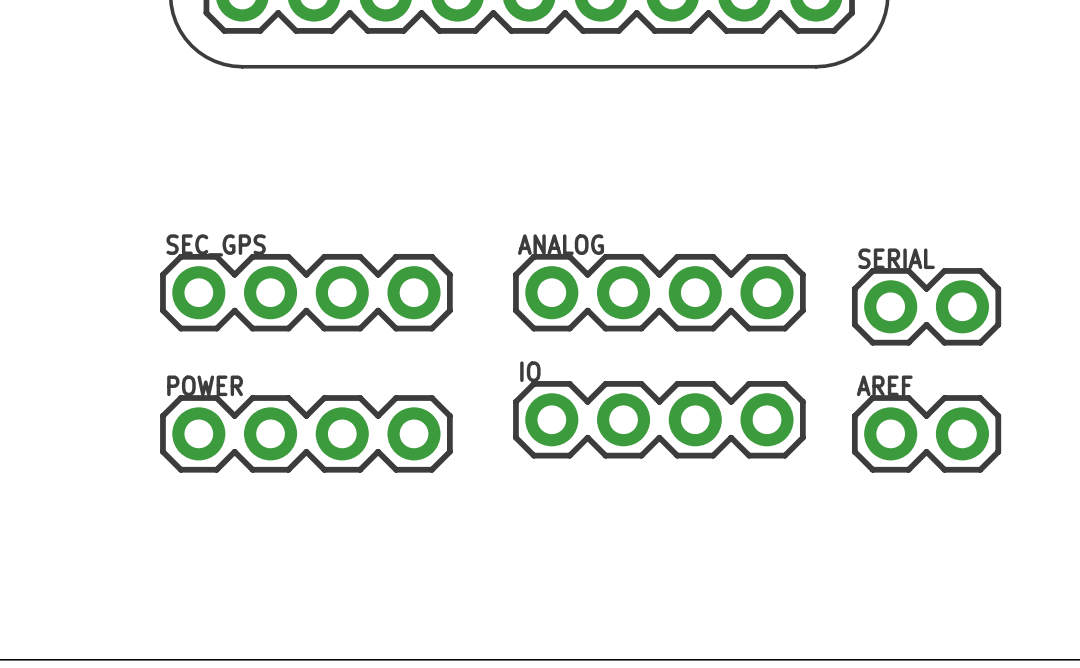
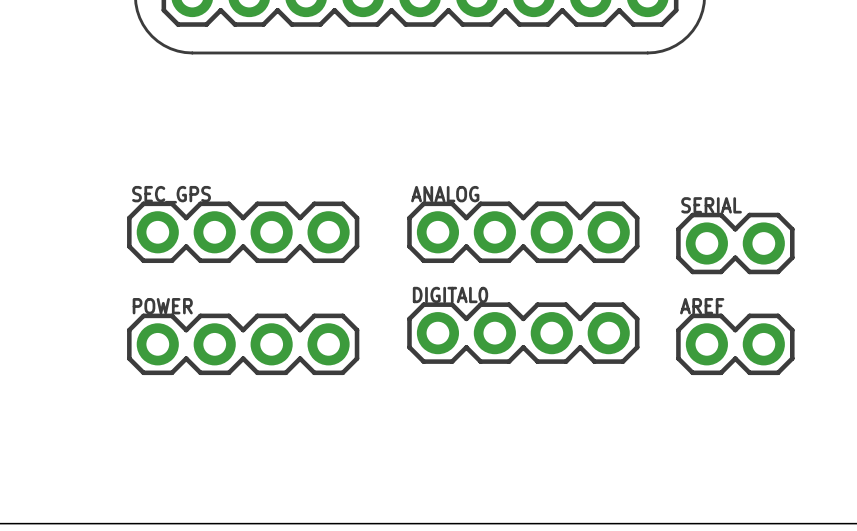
IO name: IO (530, 371) -> DIGITAL0 (450, 294)

